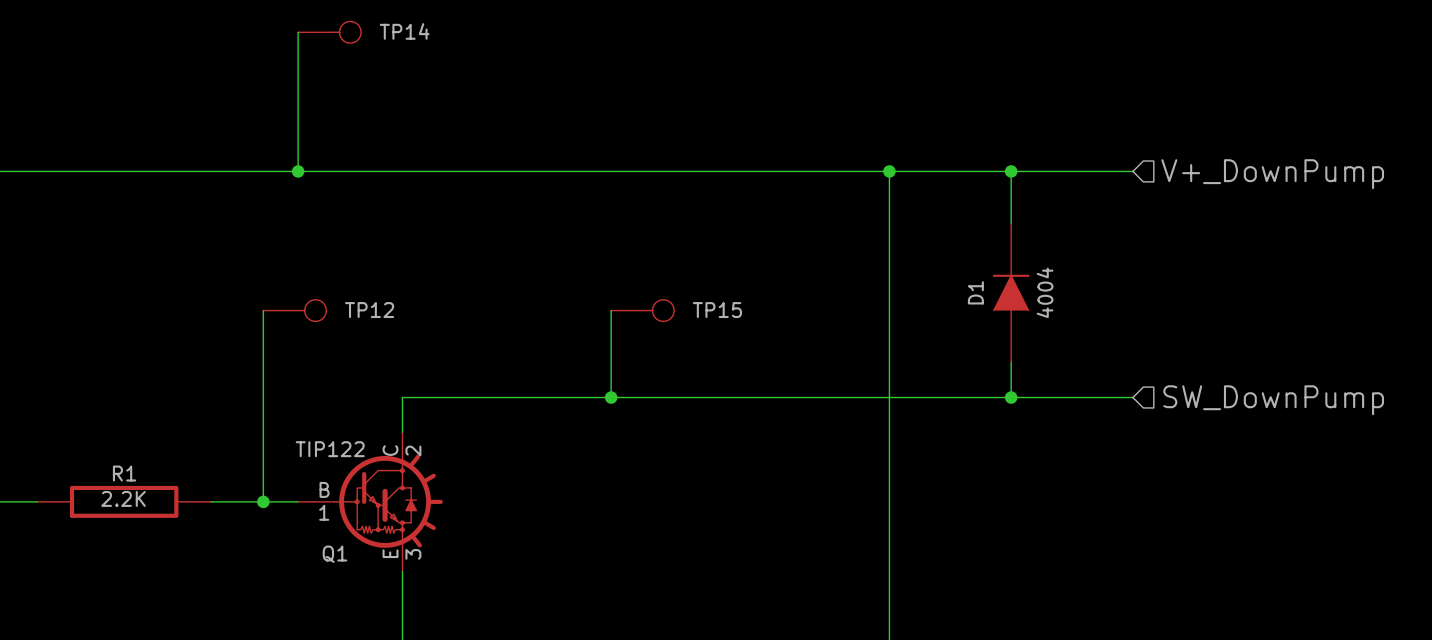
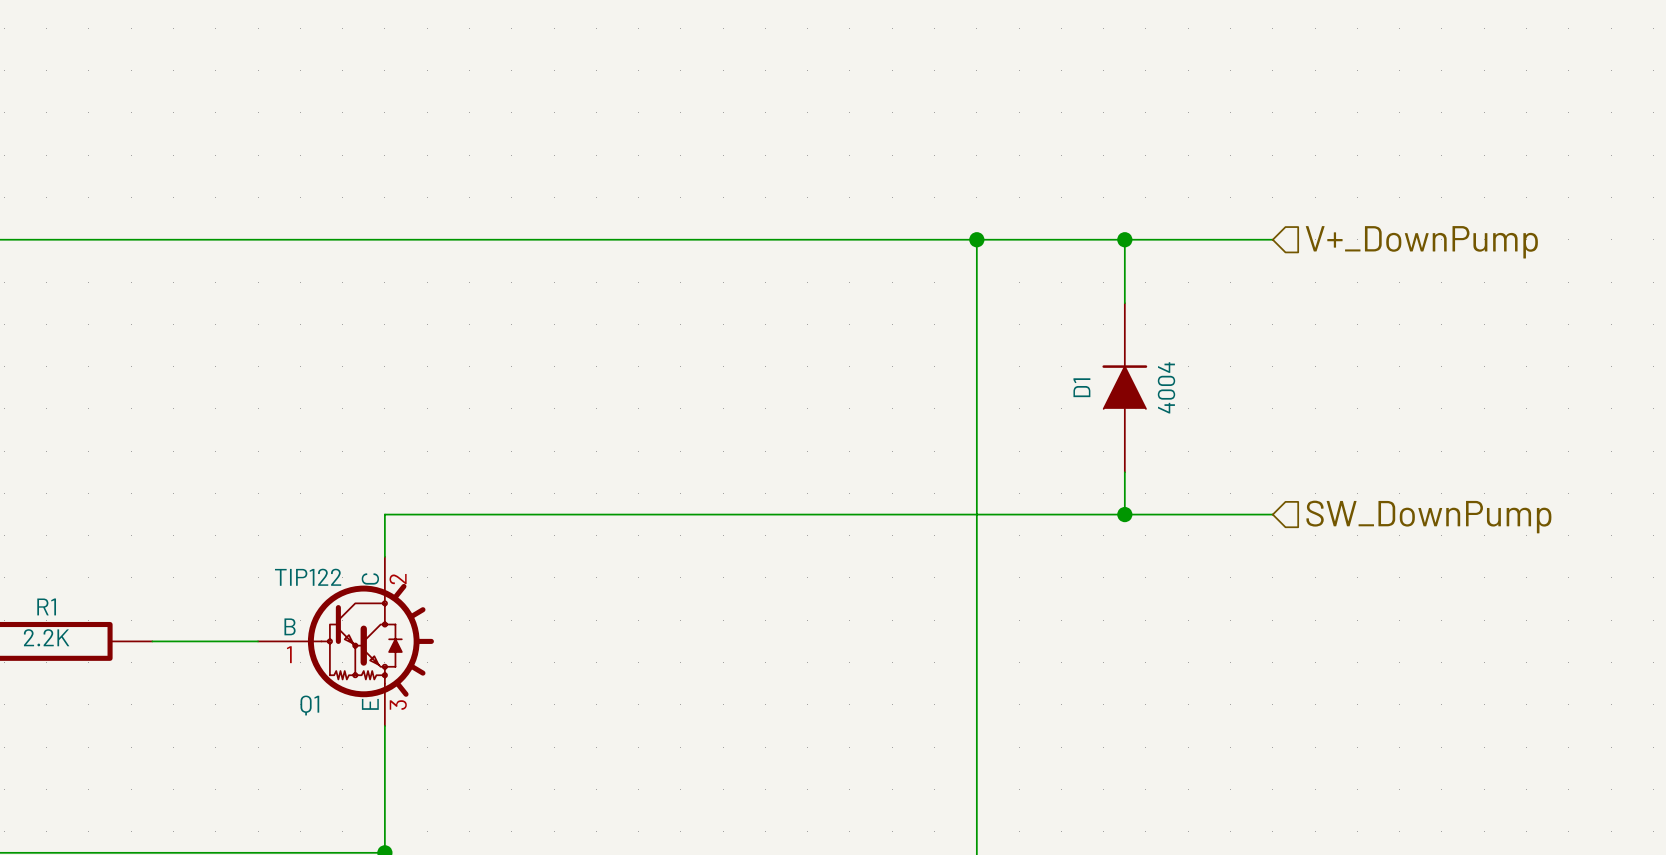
wire: (298, 32) (298, 171) -> none
TP14: (329, 32) -> none
junction: (298, 171) -> none
wire: (263, 310) (263, 501) -> none
TP12: (294, 310) -> none
wire: (611, 310) (611, 397) -> none
TP15: (642, 310) -> none
junction: (611, 397) -> none
junction: (263, 501) -> none

